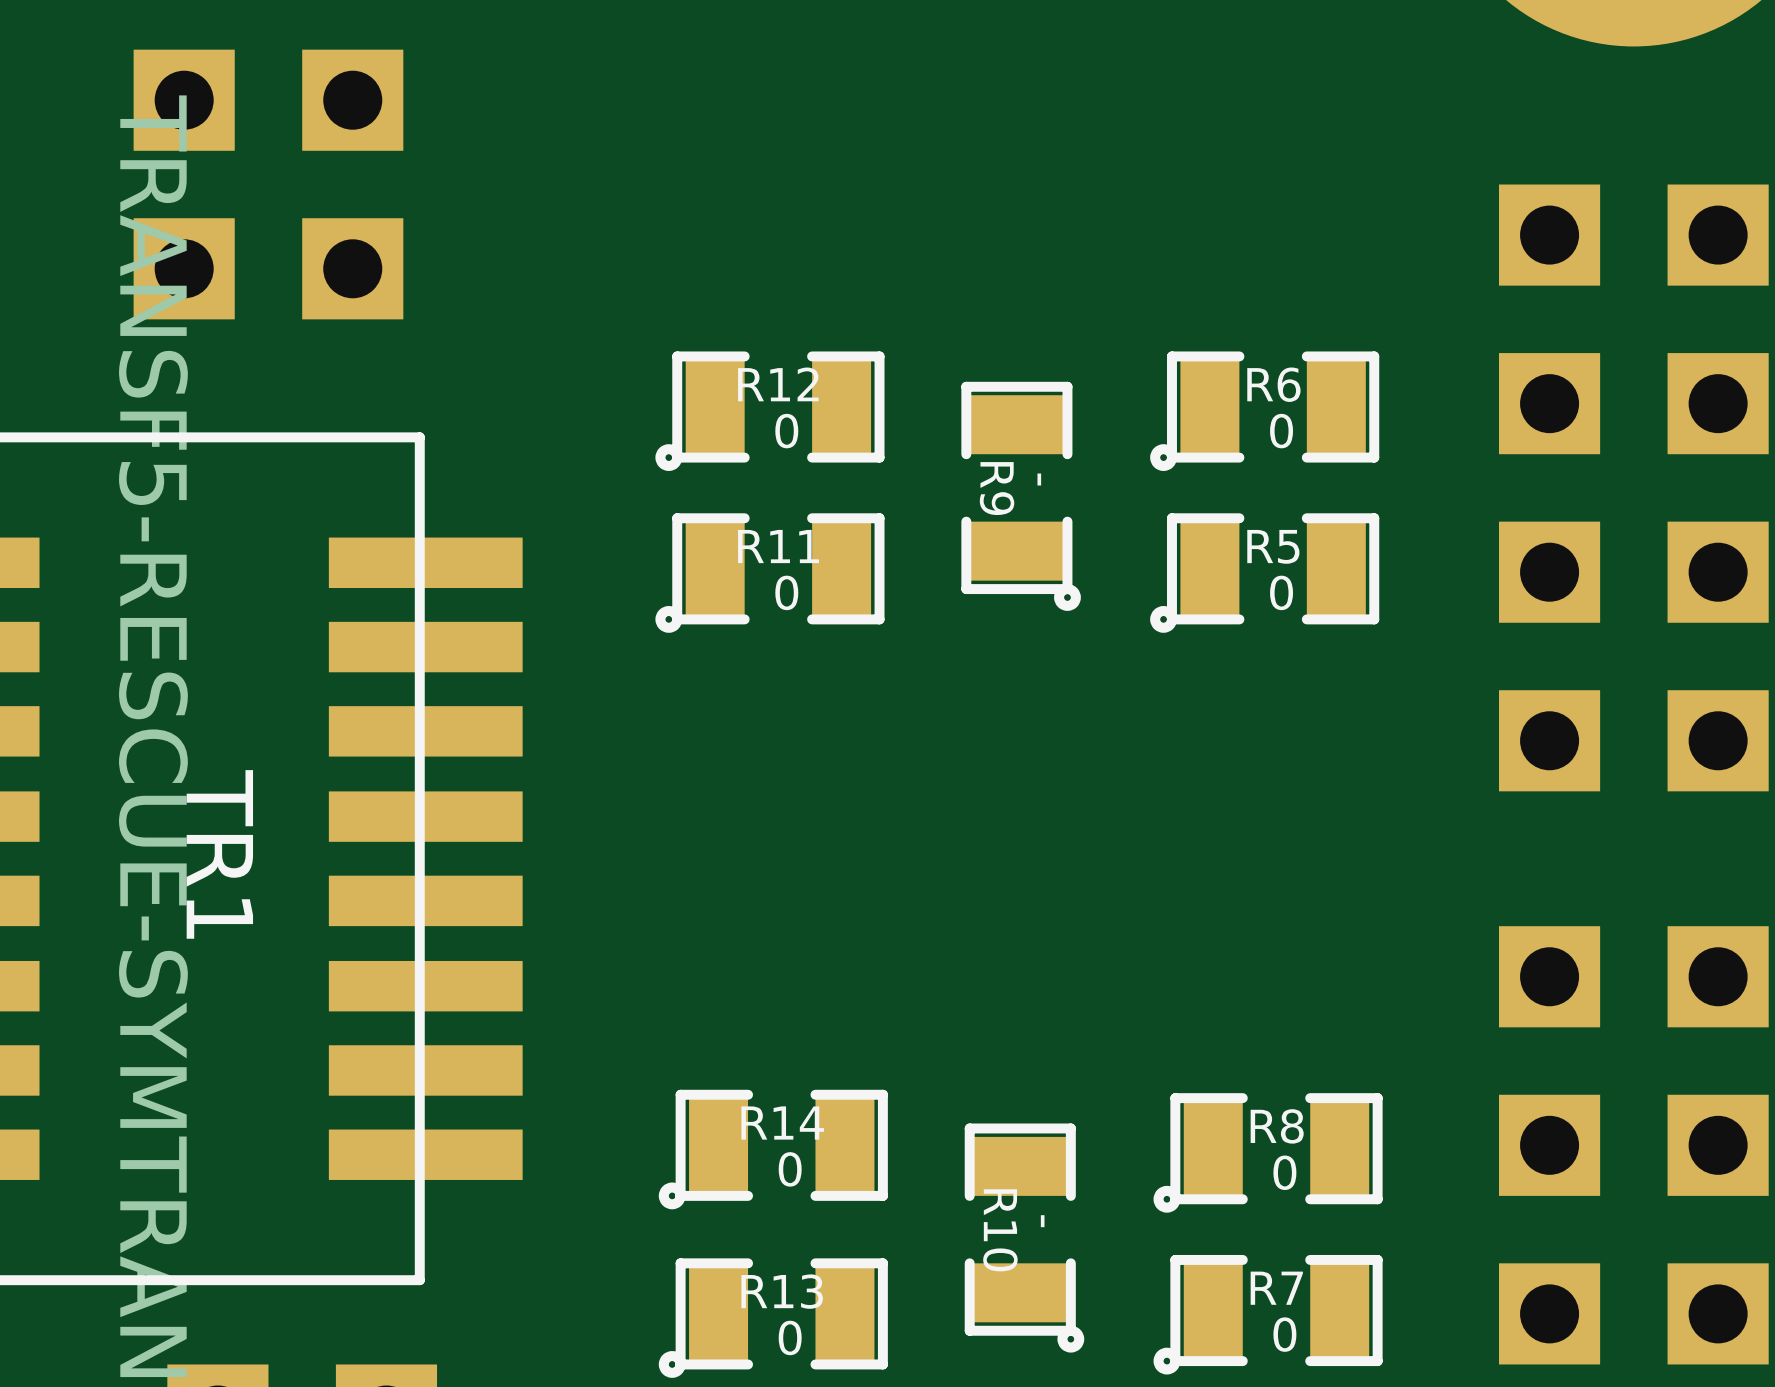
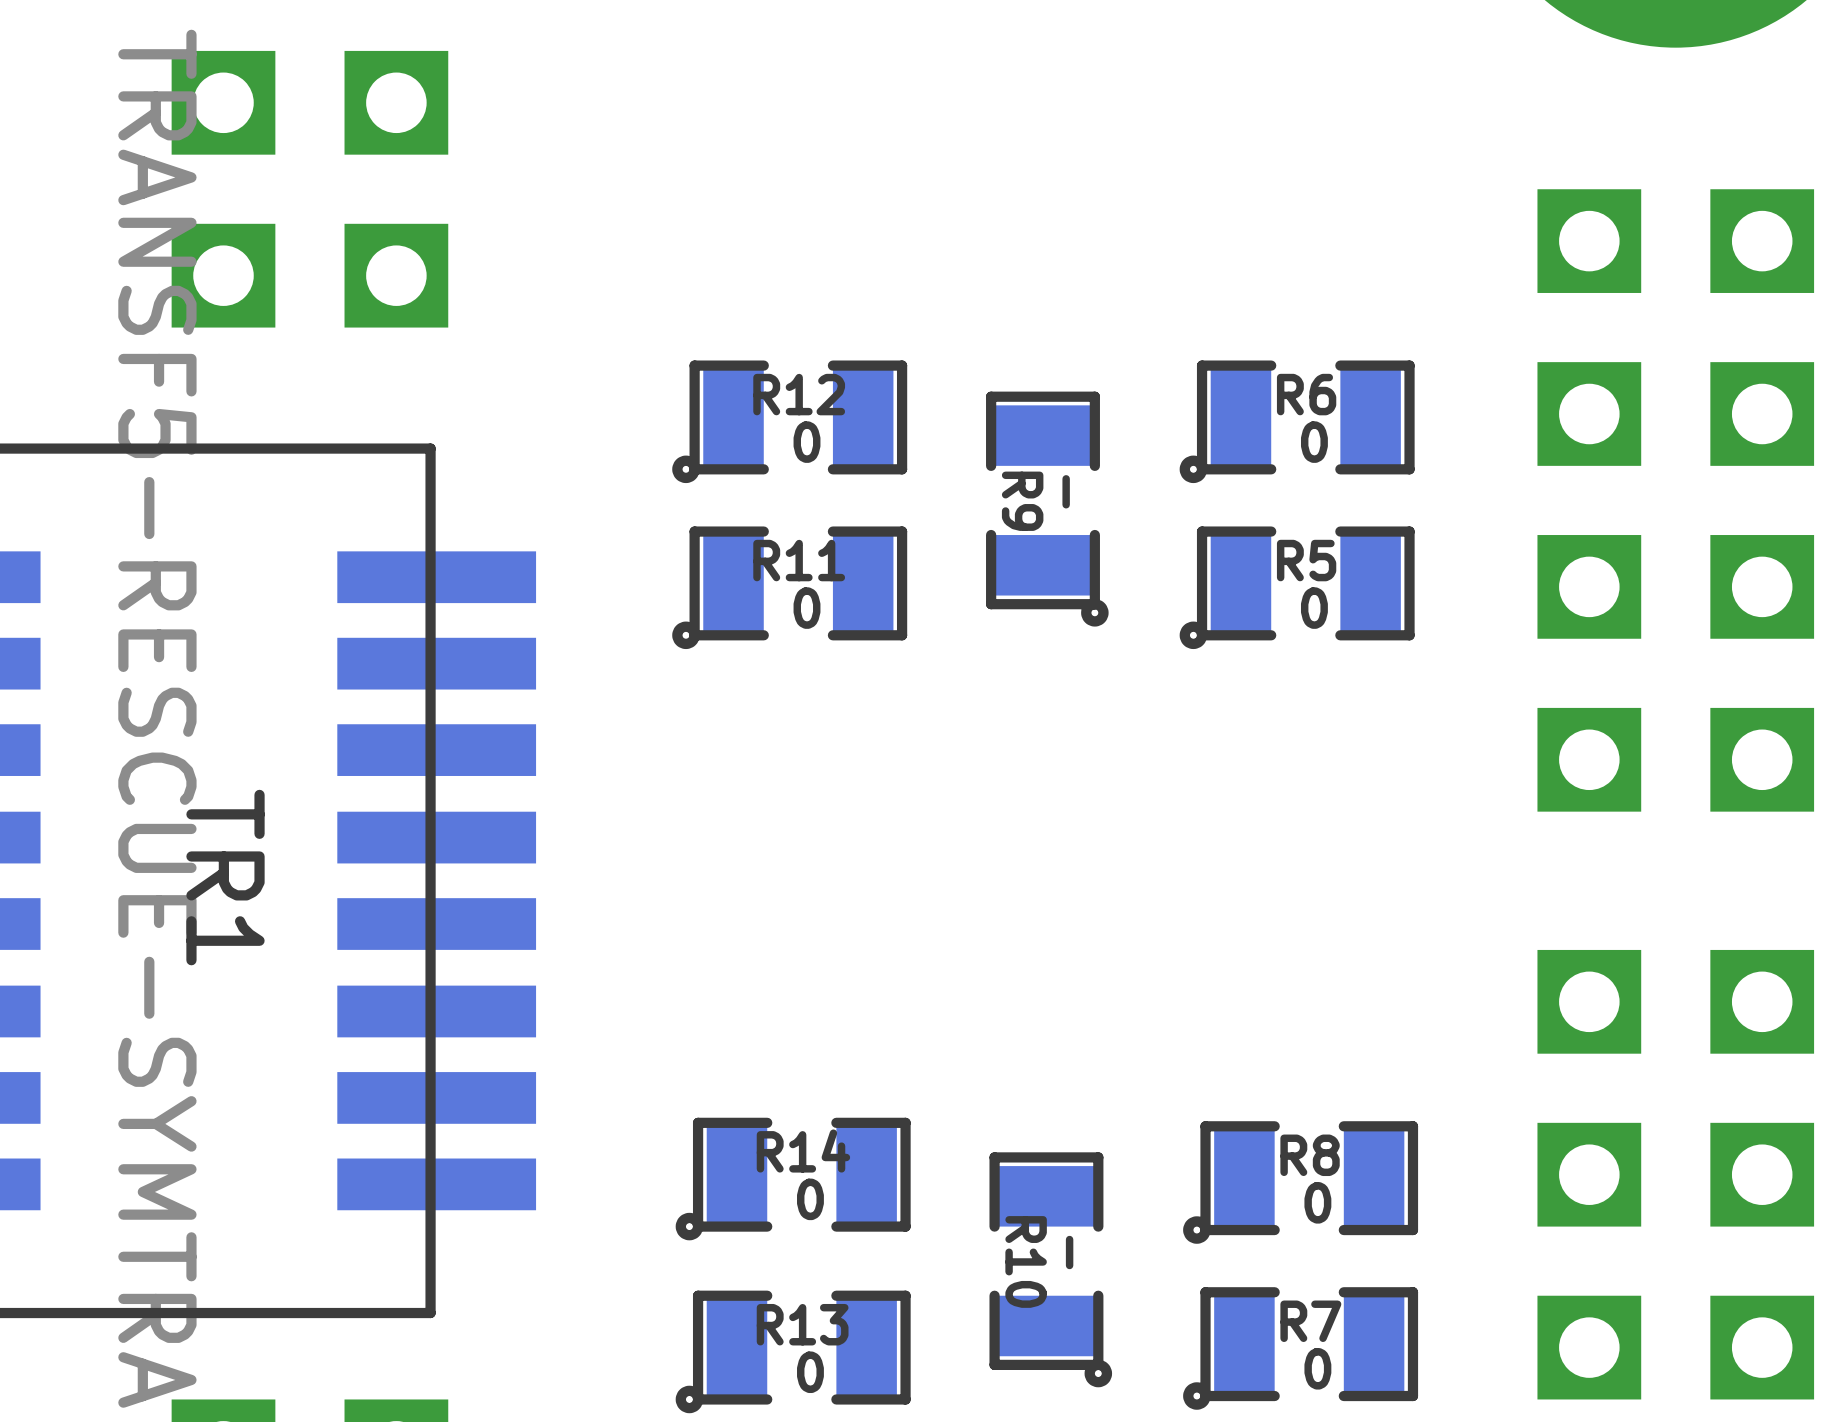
part position: (184, 184) -> (223, 189)
part position: (352, 184) -> (396, 189)

